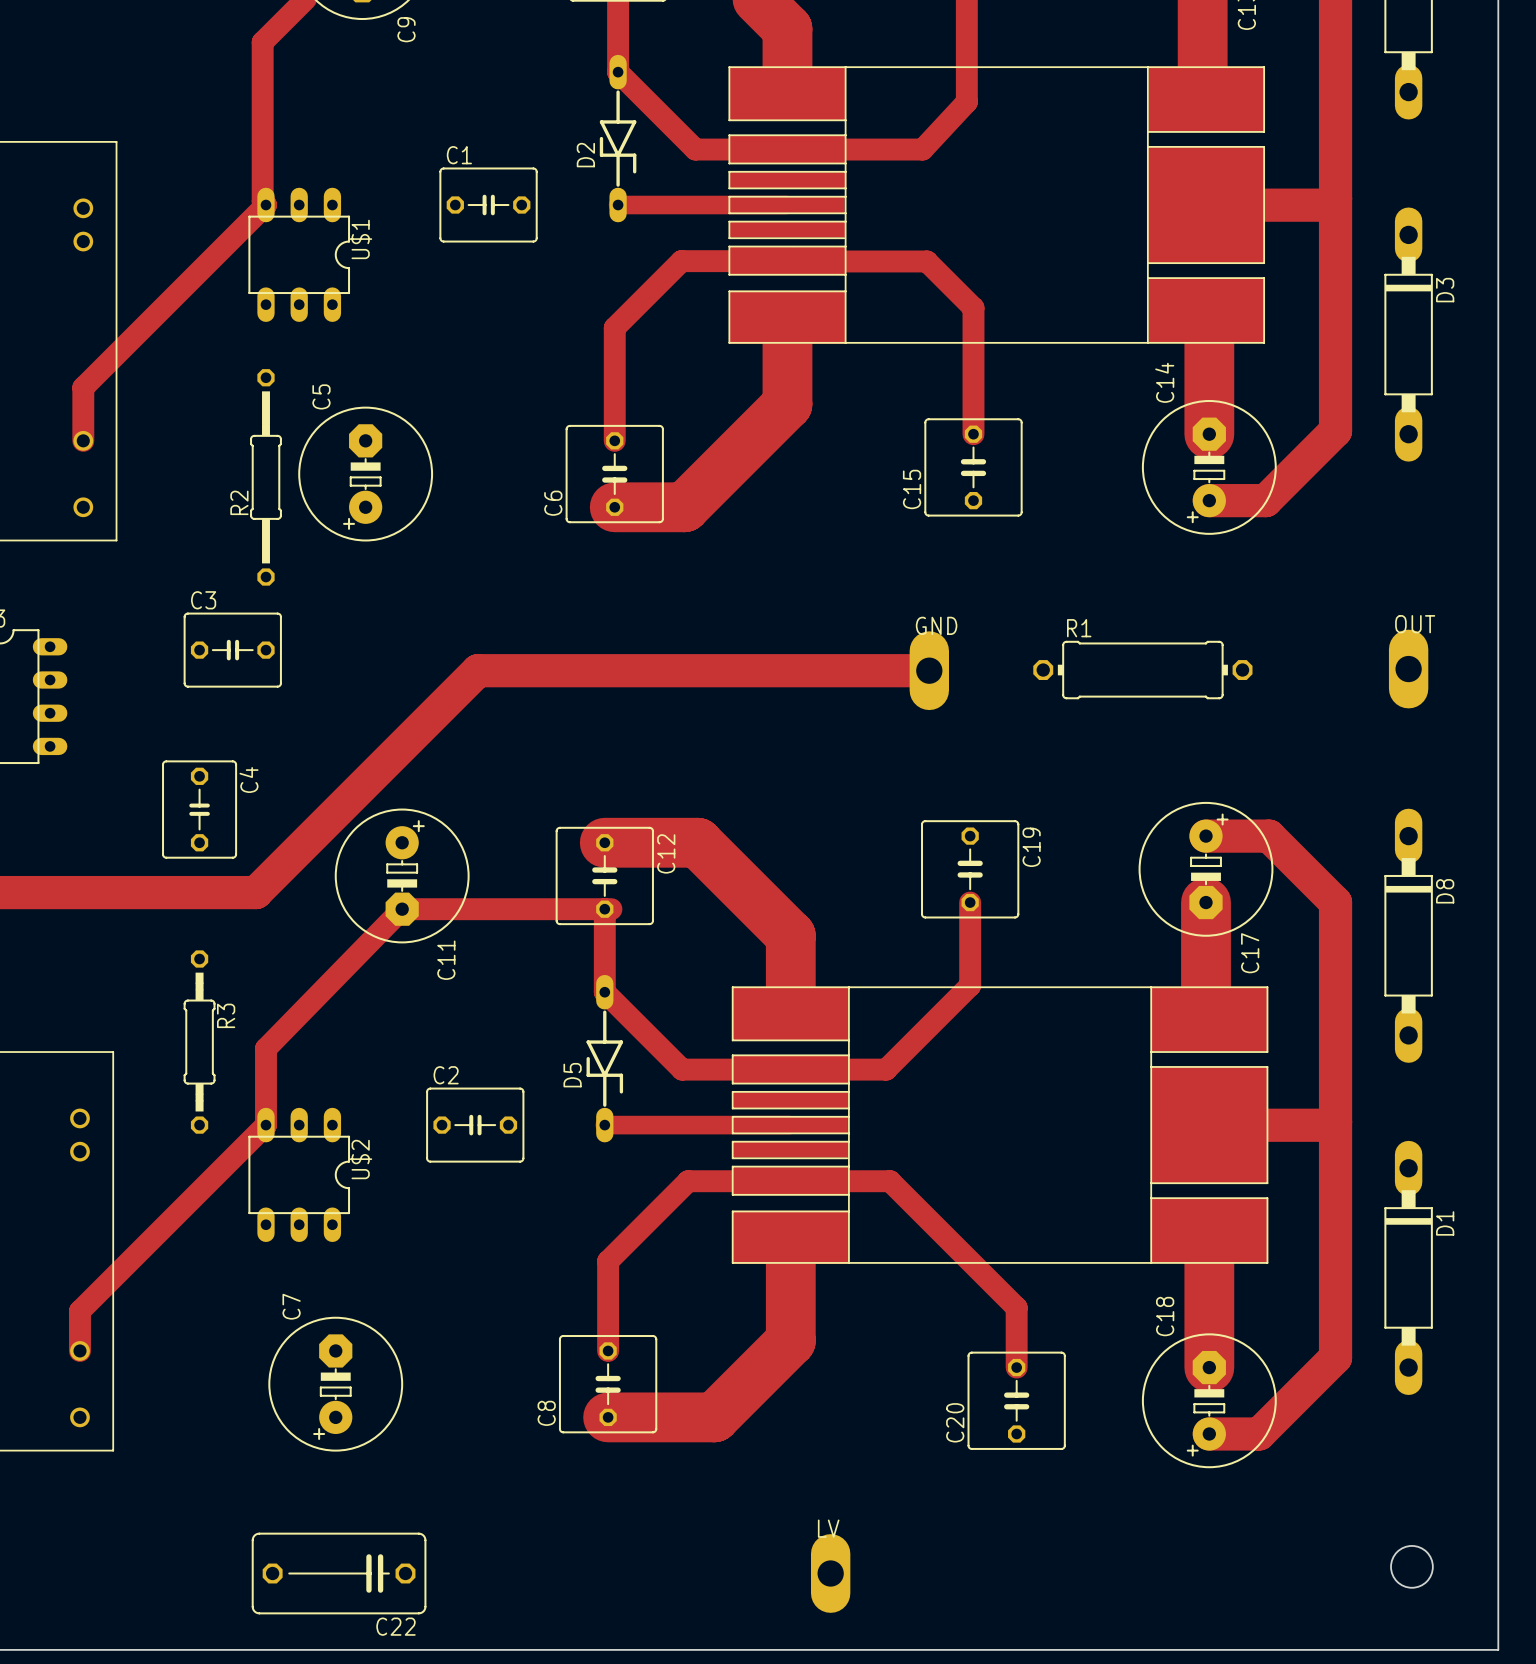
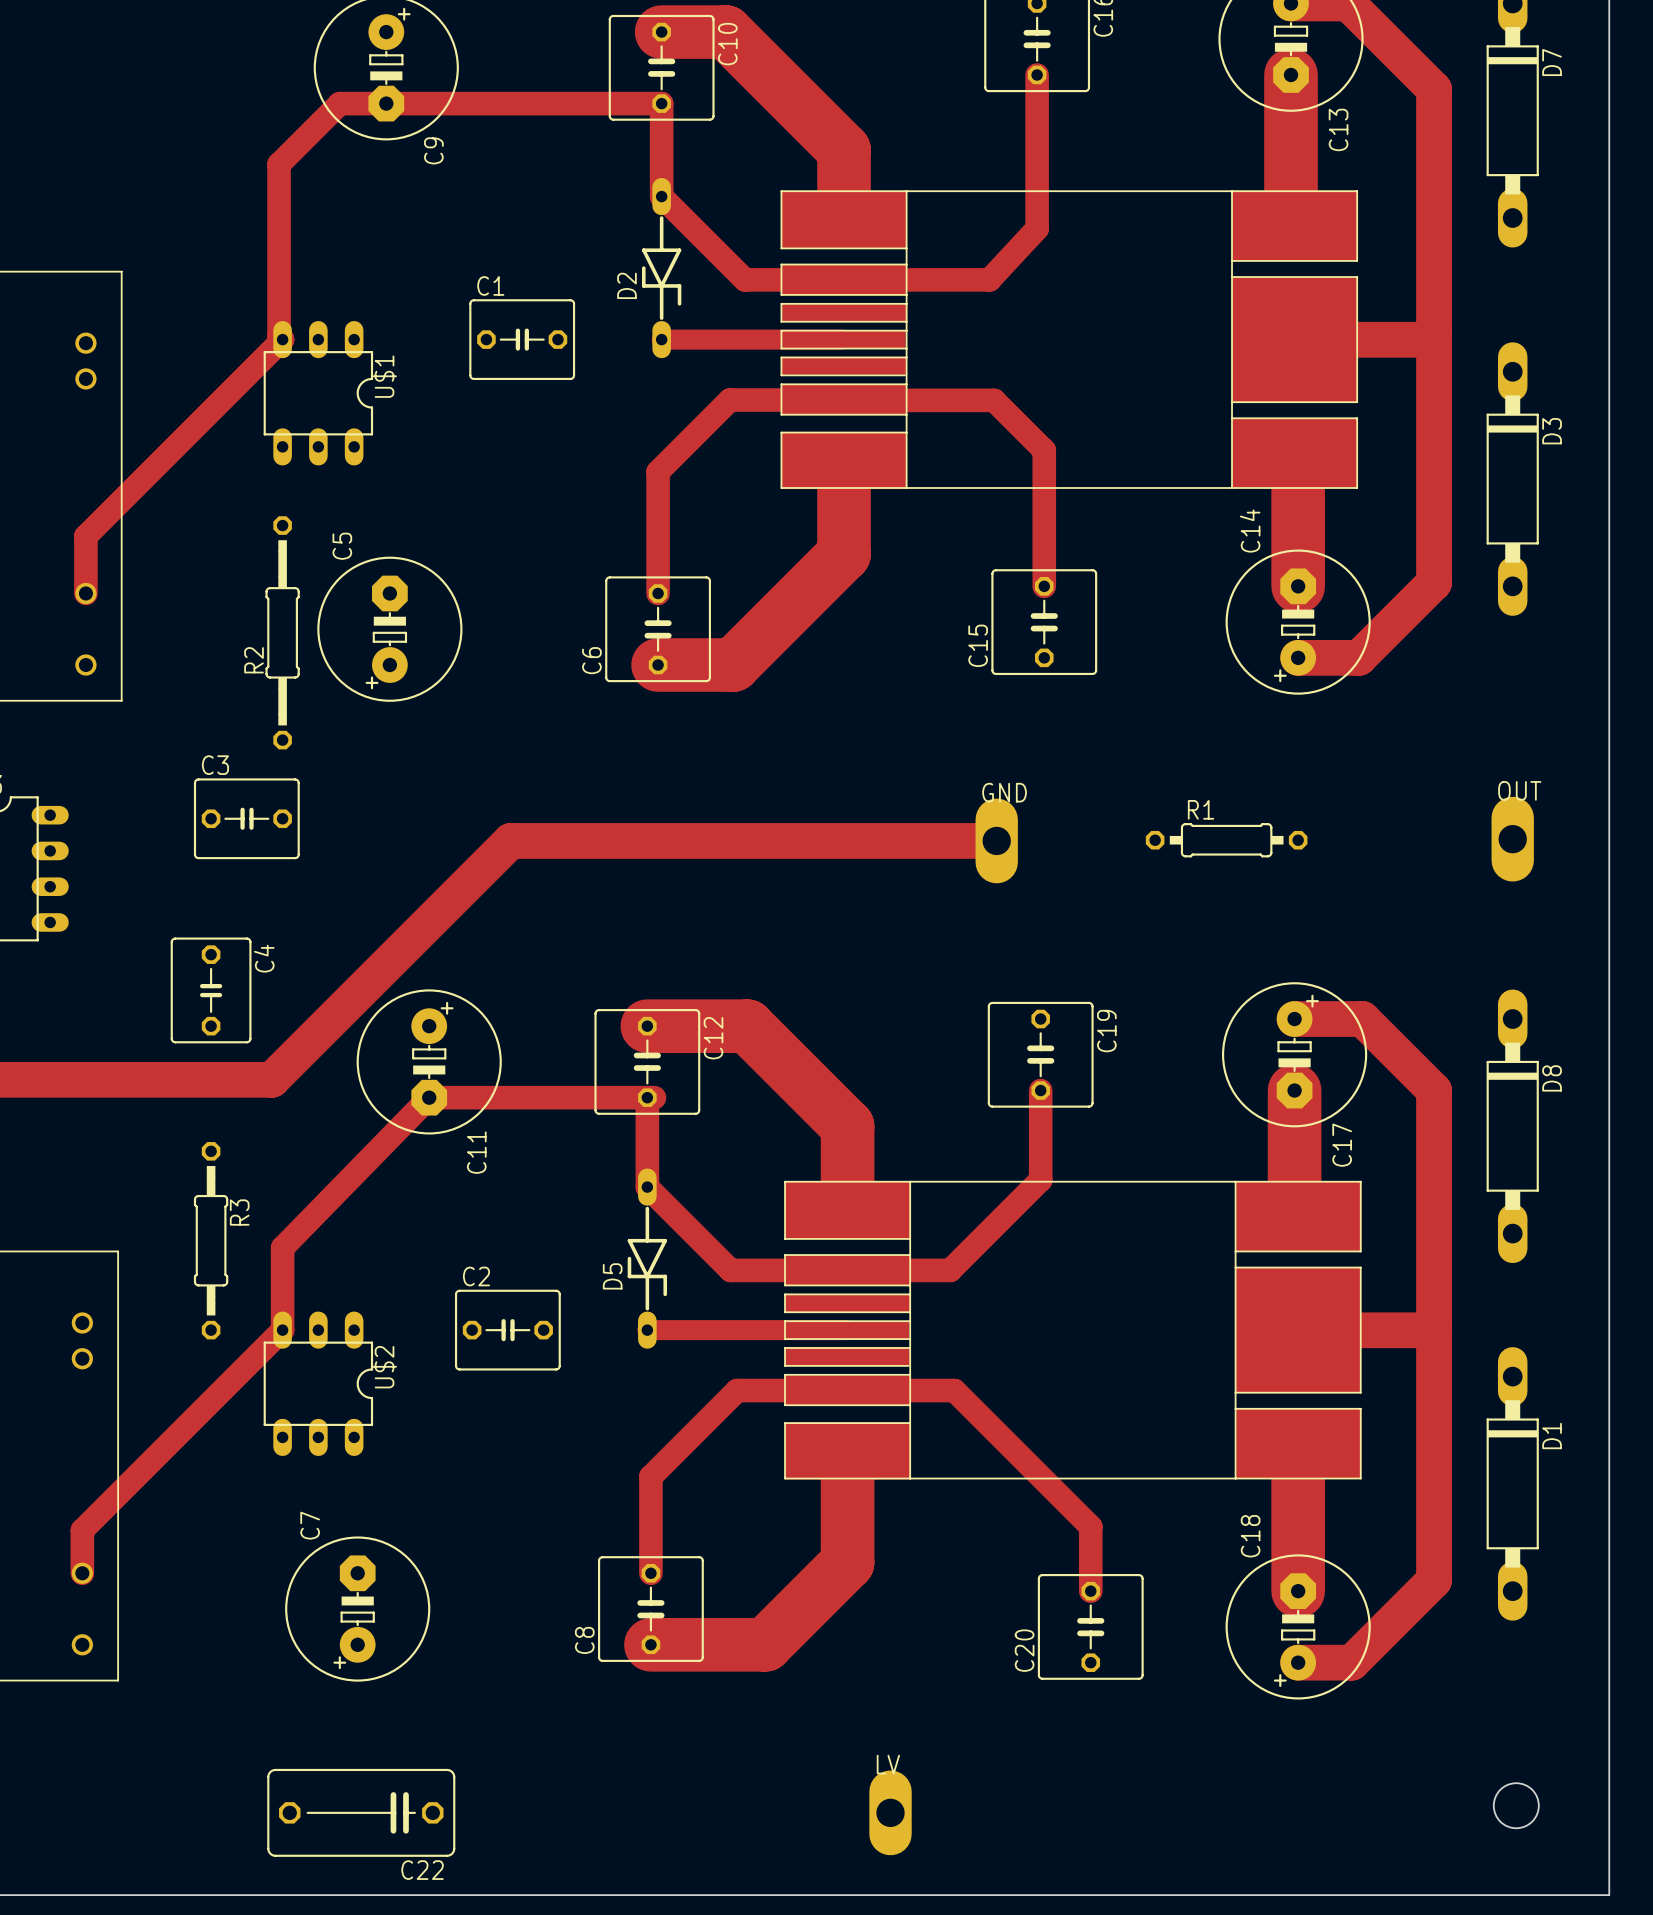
R1 name position: R1 (1079, 628) -> R1 (1201, 809)
R1 footprint: [1033, 640, 1253, 700] -> [1145, 823, 1308, 858]

